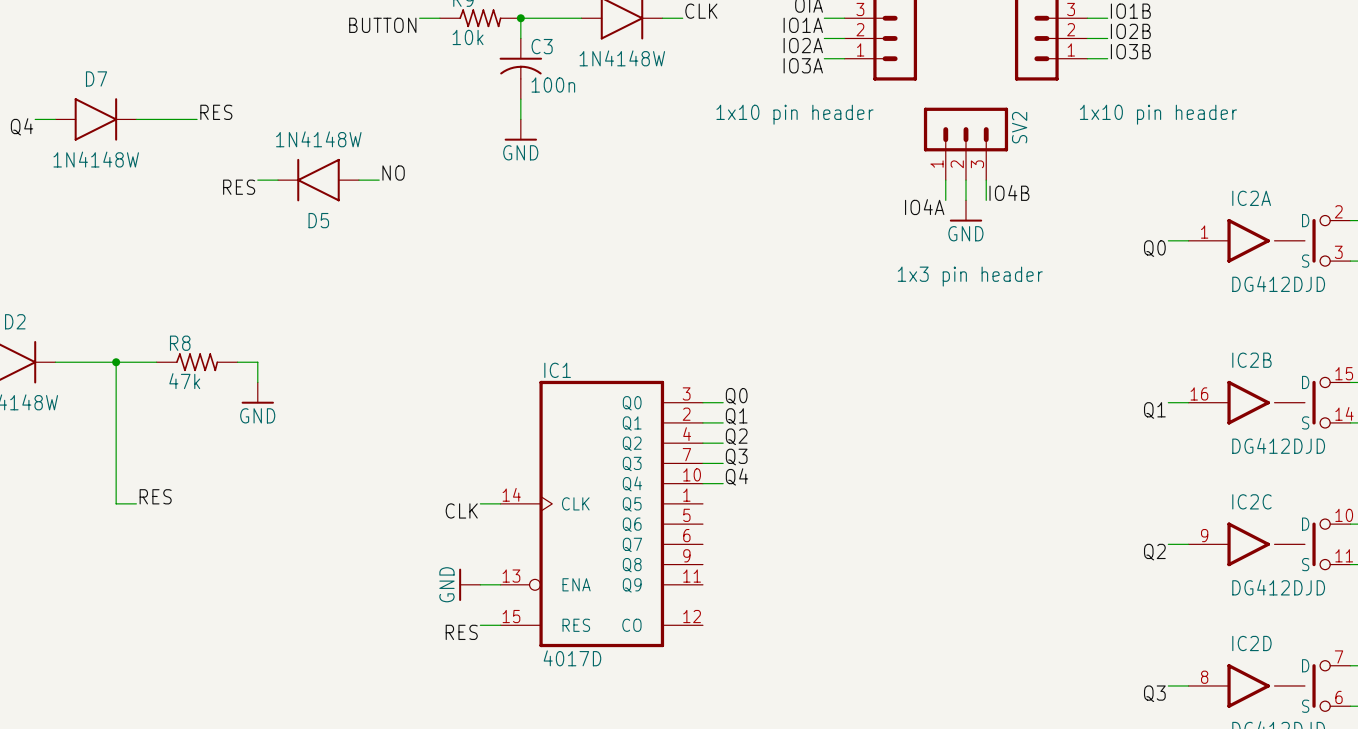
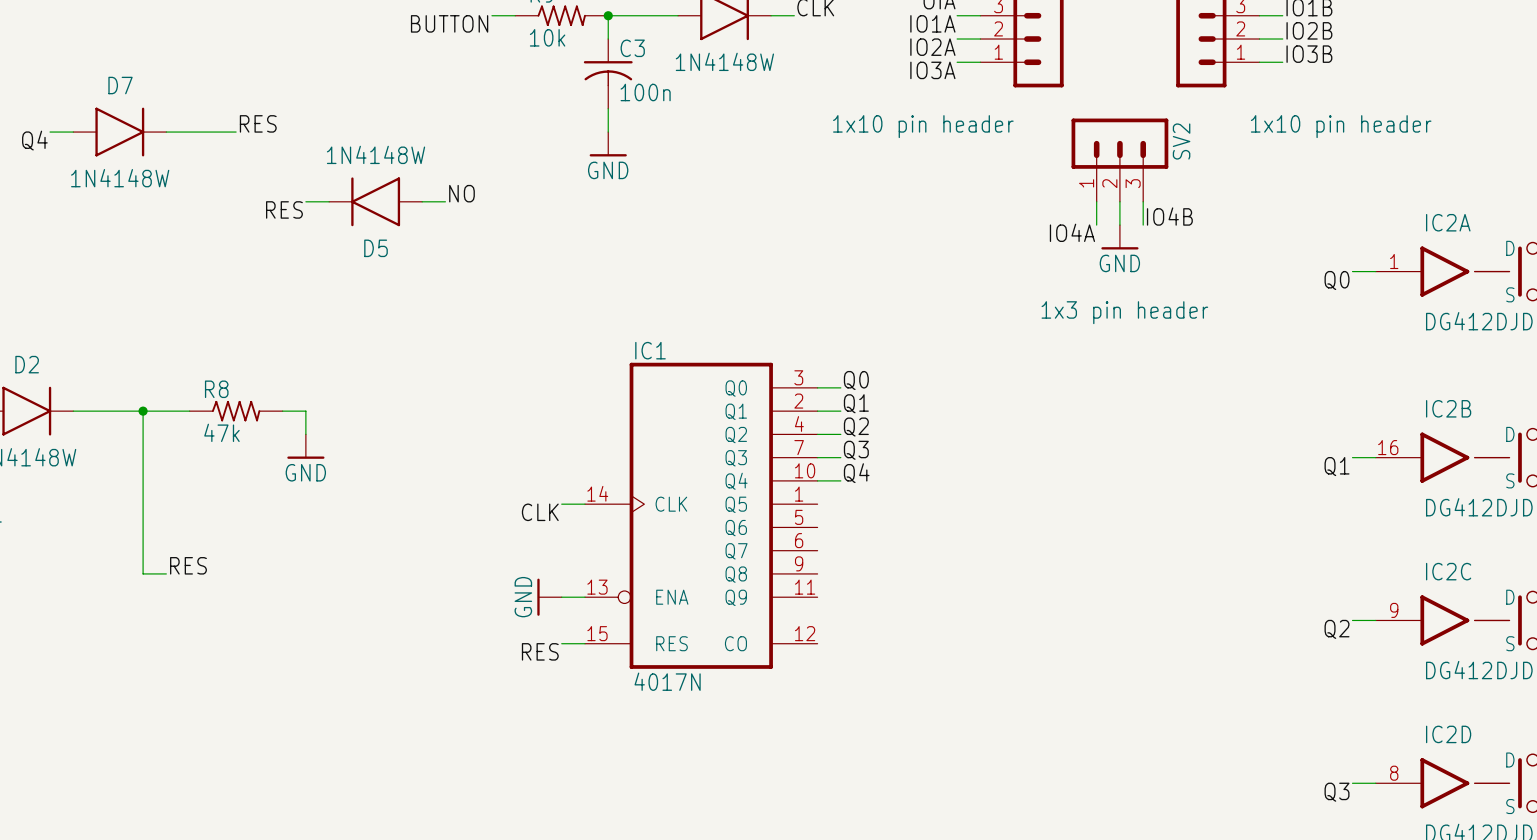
label: none -> Q0 (856, 380)
label: none -> Q1 (856, 403)
label: Q0 (736, 396) -> Q3 (856, 450)
label: Q1 (736, 416) -> Q4 (856, 473)
label position: Q2 (736, 436) -> Q2 (856, 427)
wire: (702, 443) (723, 443) -> (817, 434) (840, 434)
label: Q3 (736, 457) -> none
wire: (702, 463) (723, 463) -> (817, 411) (840, 411)
label: Q4 (736, 476) -> none
wire: (702, 483) (723, 483) -> (817, 387) (840, 387)
wire: (480, 503) (500, 503) -> (561, 504) (584, 504)
label position: CLK (461, 510) -> CLK (540, 512)
IC1 position: (601, 513) -> (701, 515)
power symbol position: GND (469, 584) -> GND (549, 597)
wire: (480, 584) (500, 584) -> (561, 597) (584, 597)
wire: (480, 625) (500, 625) -> (561, 643) (584, 643)
label position: RES (461, 632) -> RES (540, 651)
IC1 value: 4017D (572, 658) -> 4017N (667, 681)

